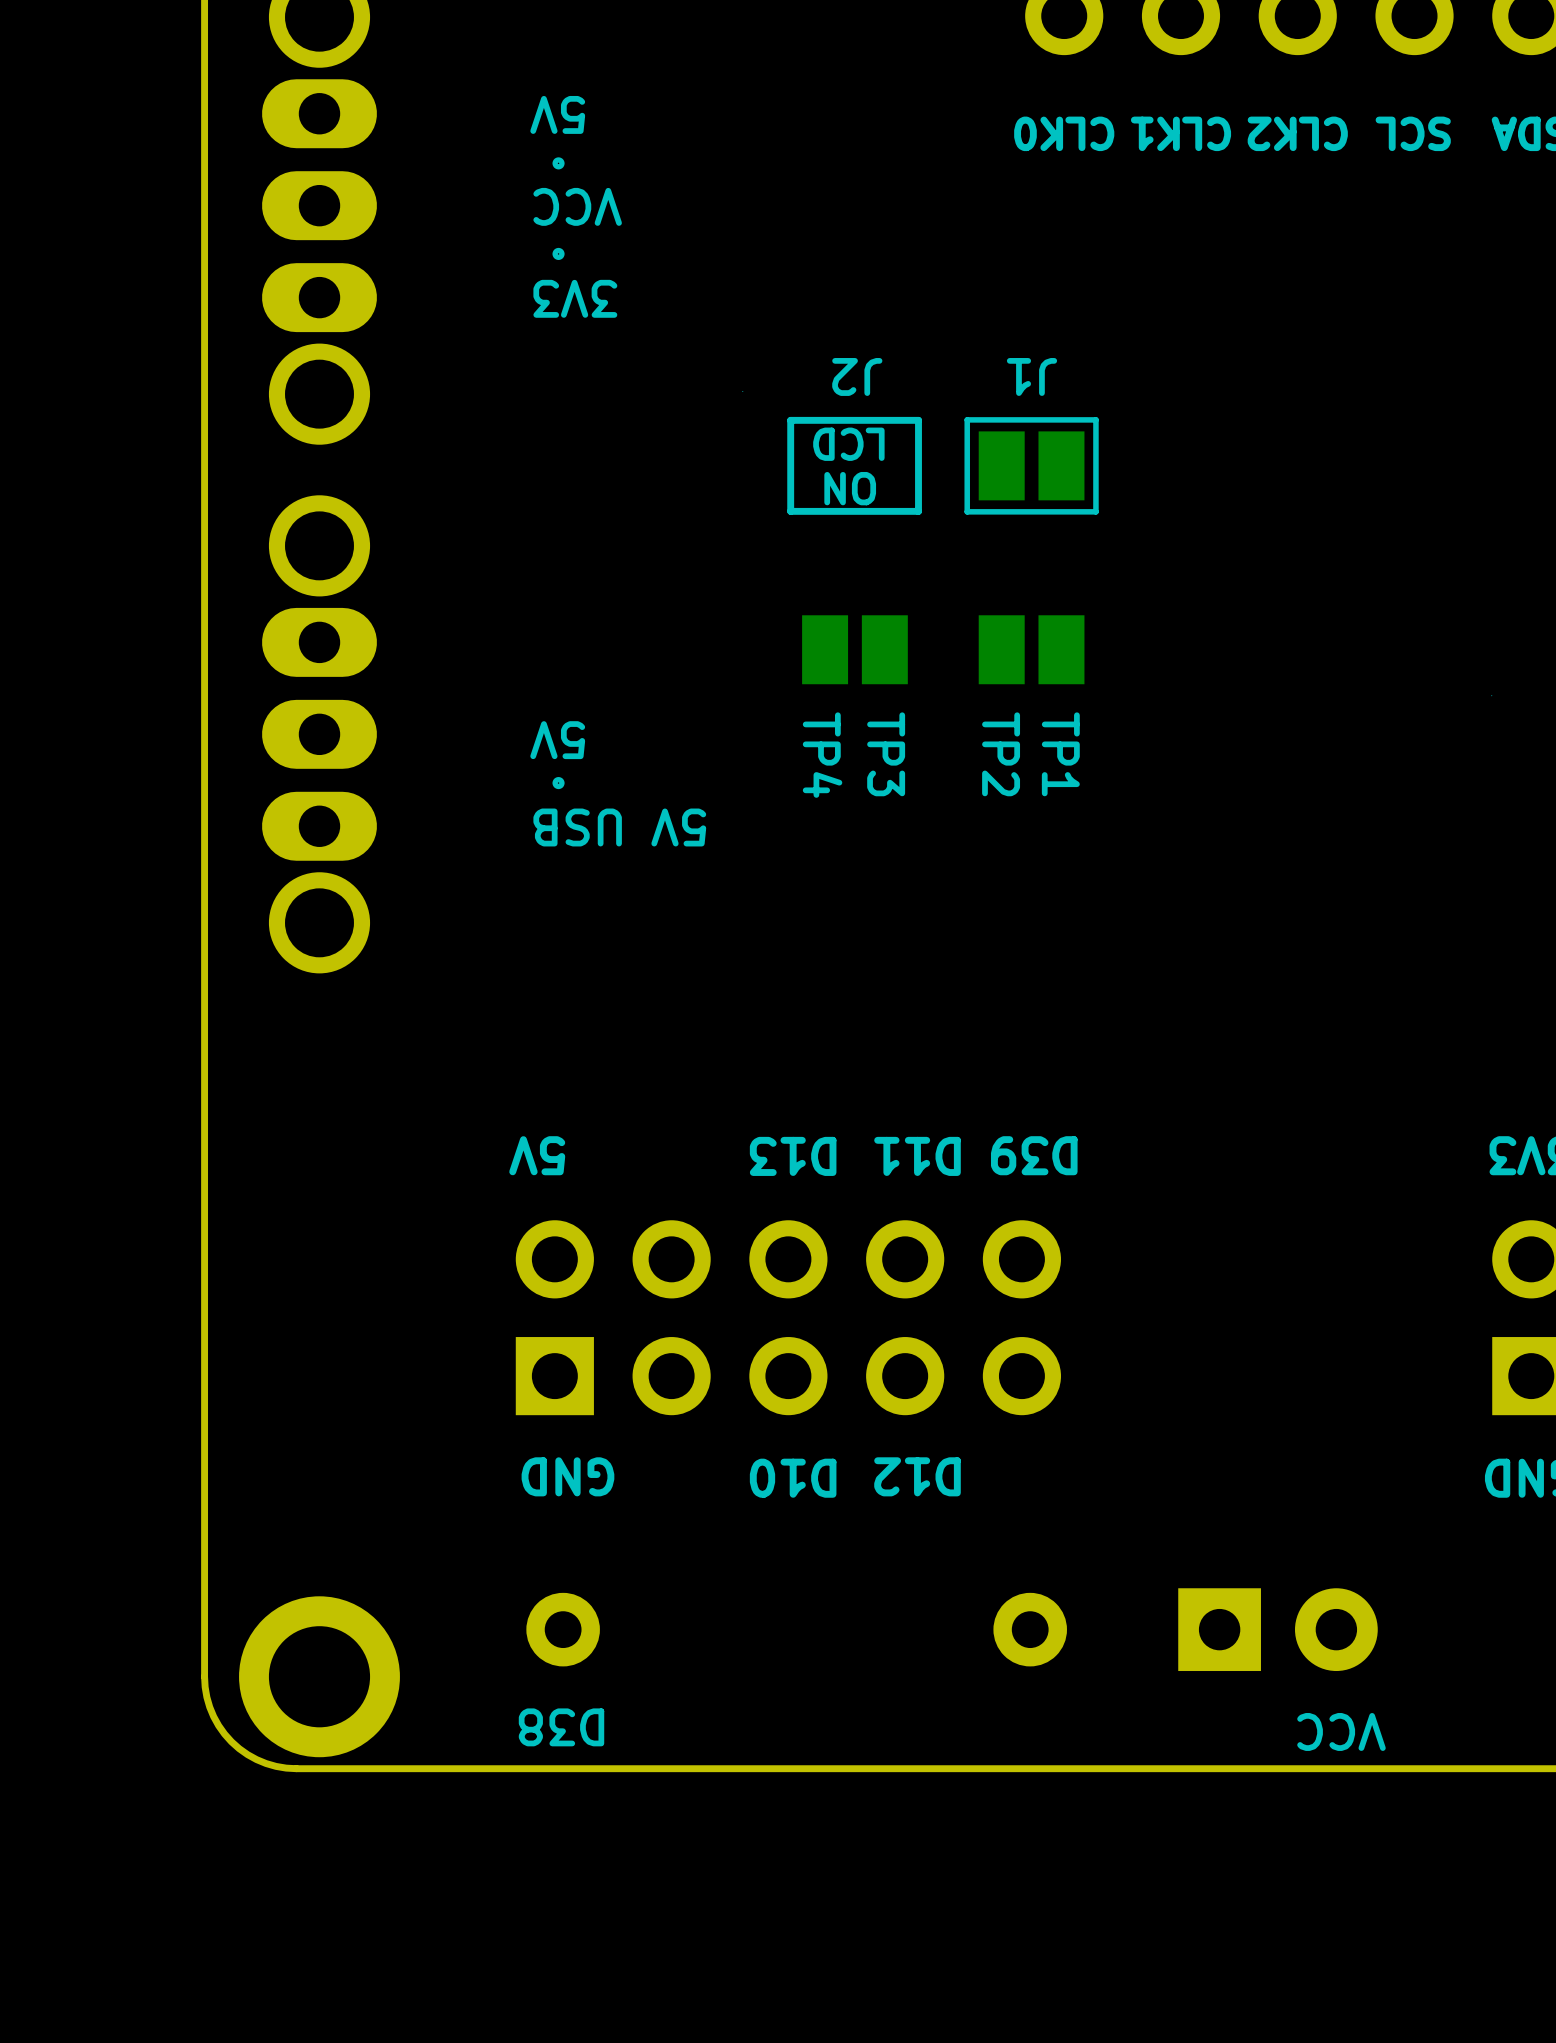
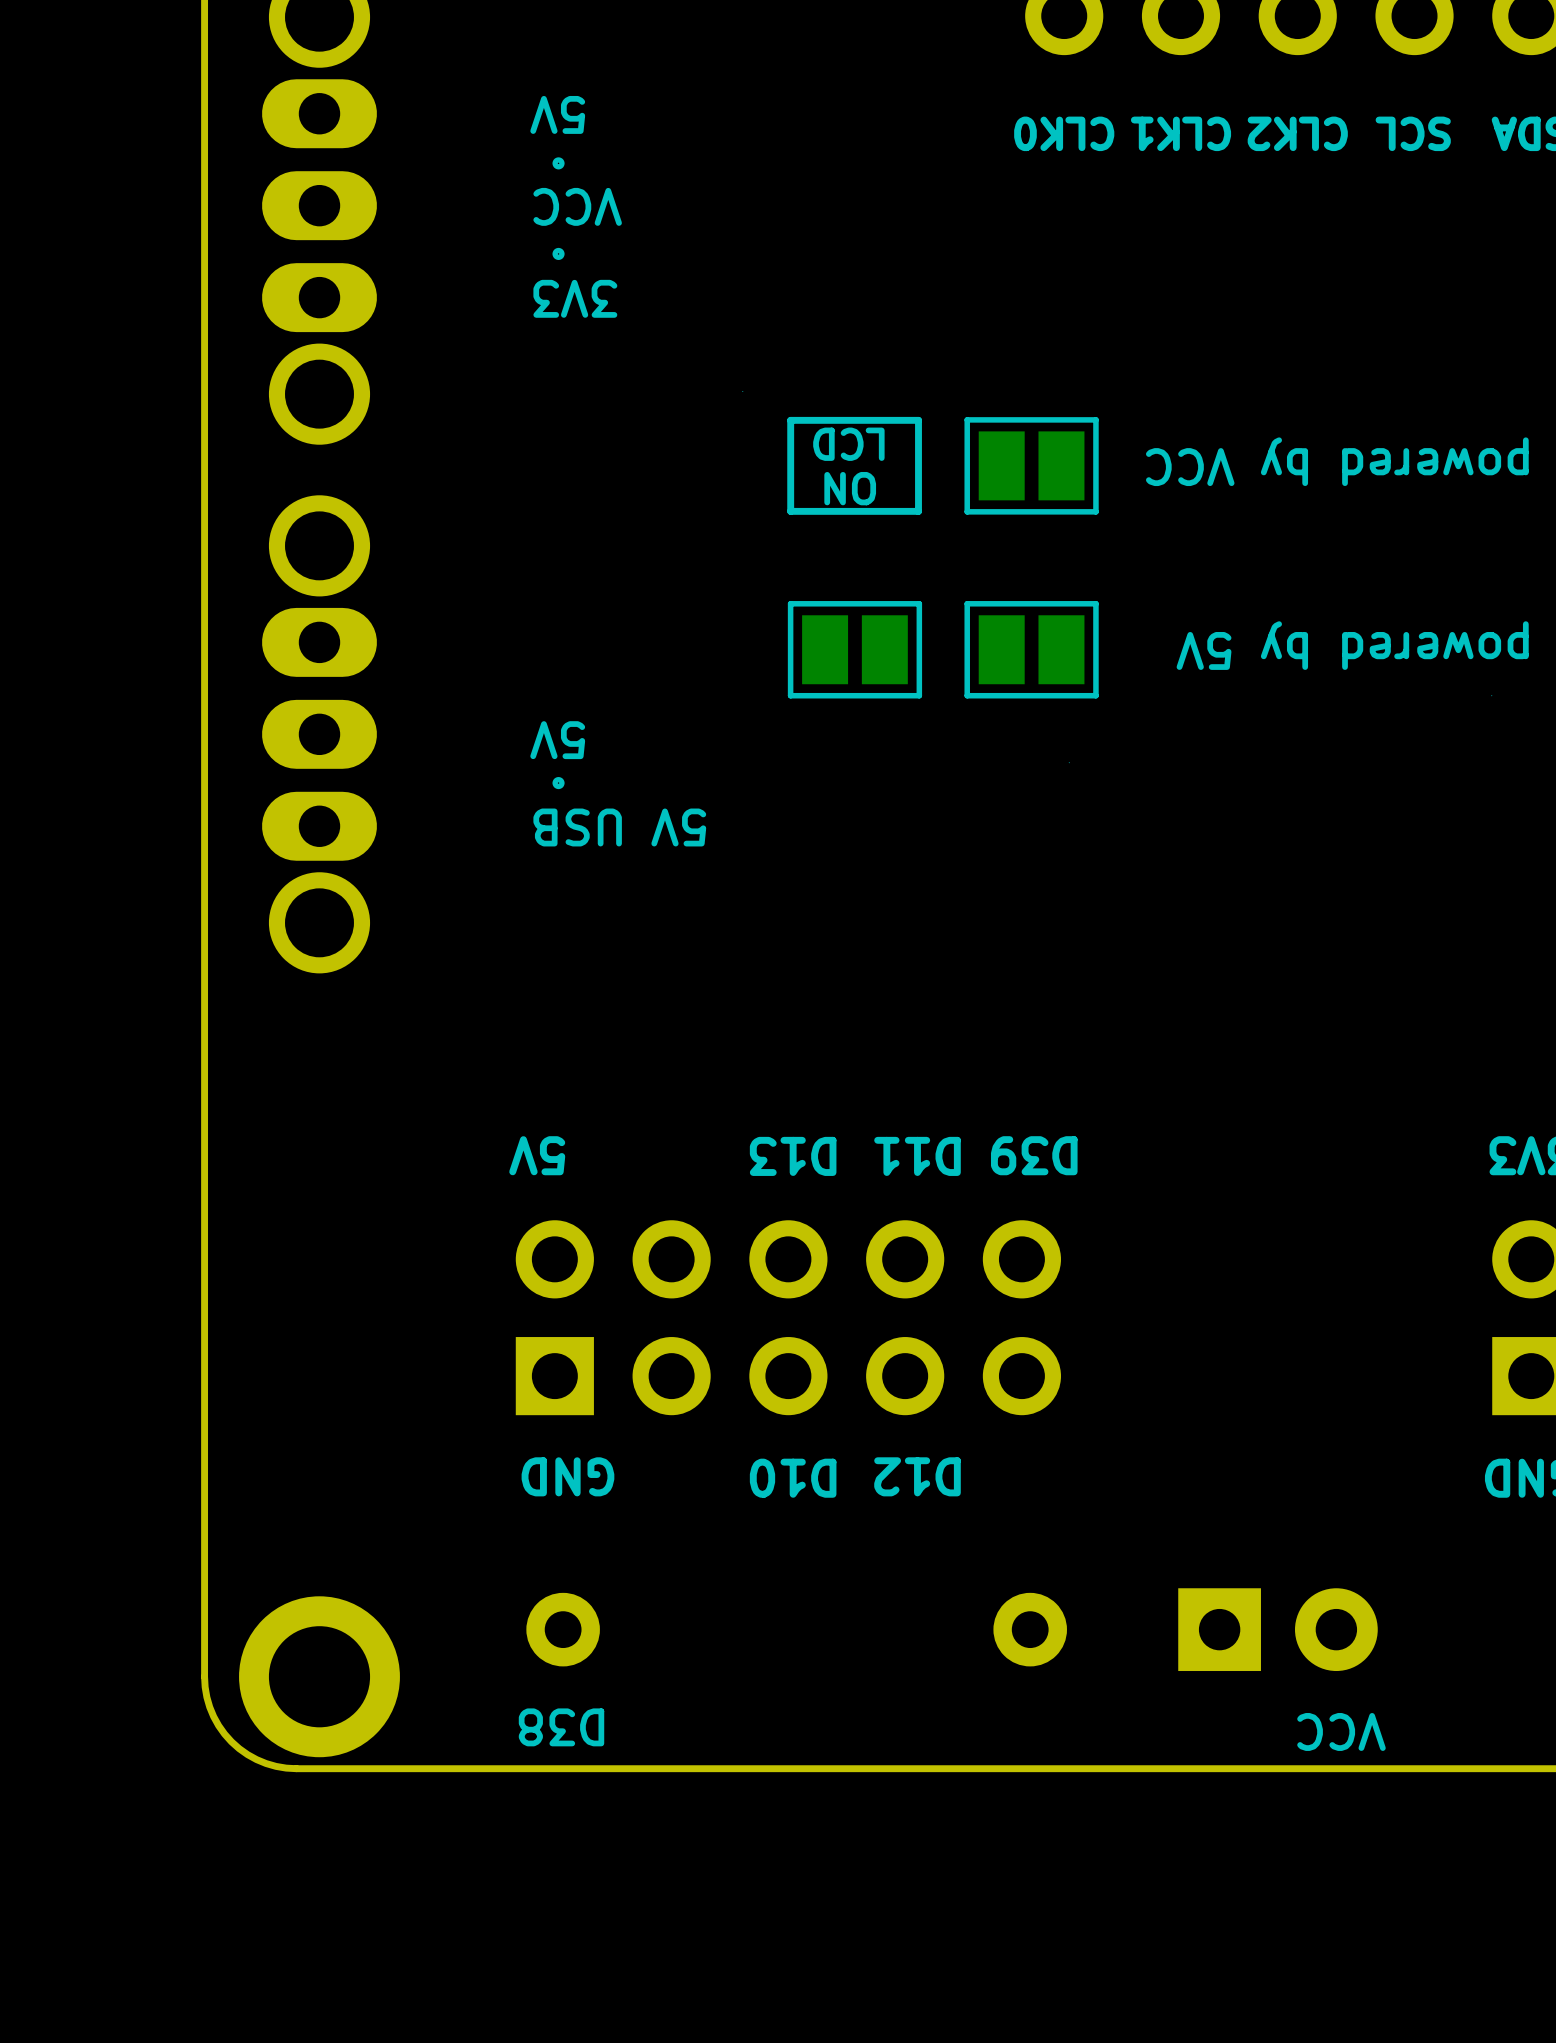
text: J2 (857, 376) -> none
text: J1 (1031, 376) -> none
text: none -> powered by VCC (1337, 461)
part footprint: [802, 615, 908, 685] -> [787, 601, 923, 699]
part footprint: [978, 615, 1085, 685] -> [964, 601, 1099, 699]
text: none -> powered by 5V (1352, 645)
text: TP3 (886, 754) -> none
text: TP2 (1001, 754) -> none
text: TP1 (1060, 754) -> none
text: TP4 (822, 755) -> none

